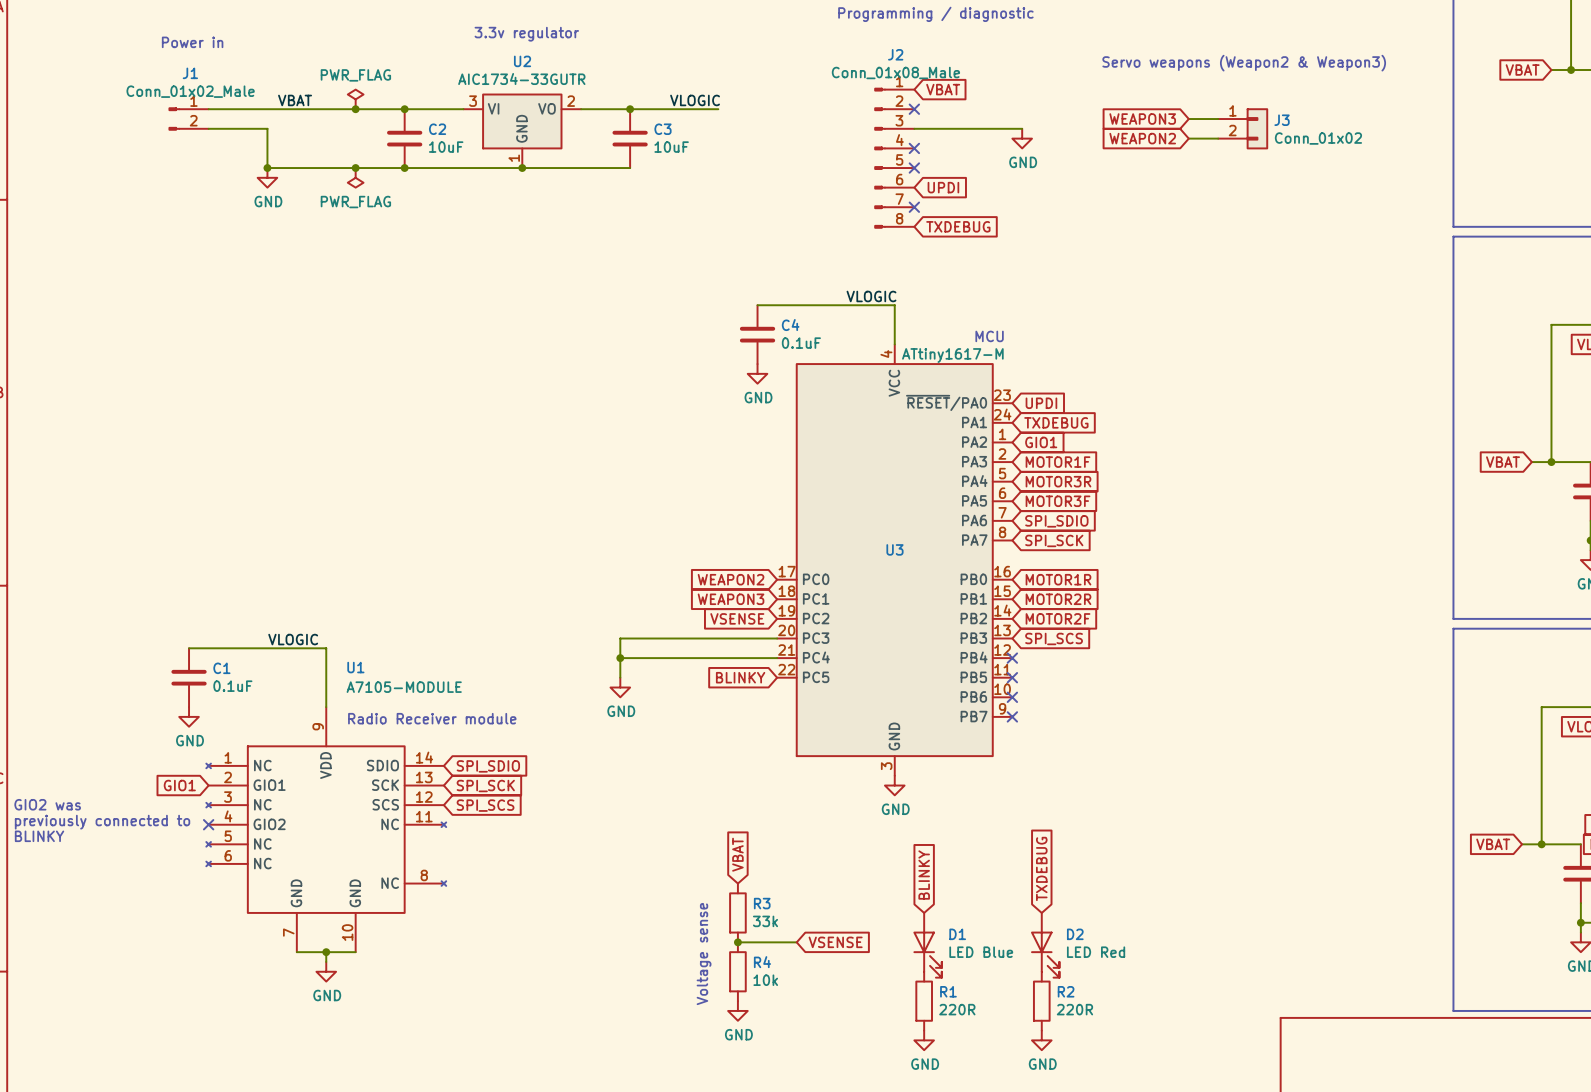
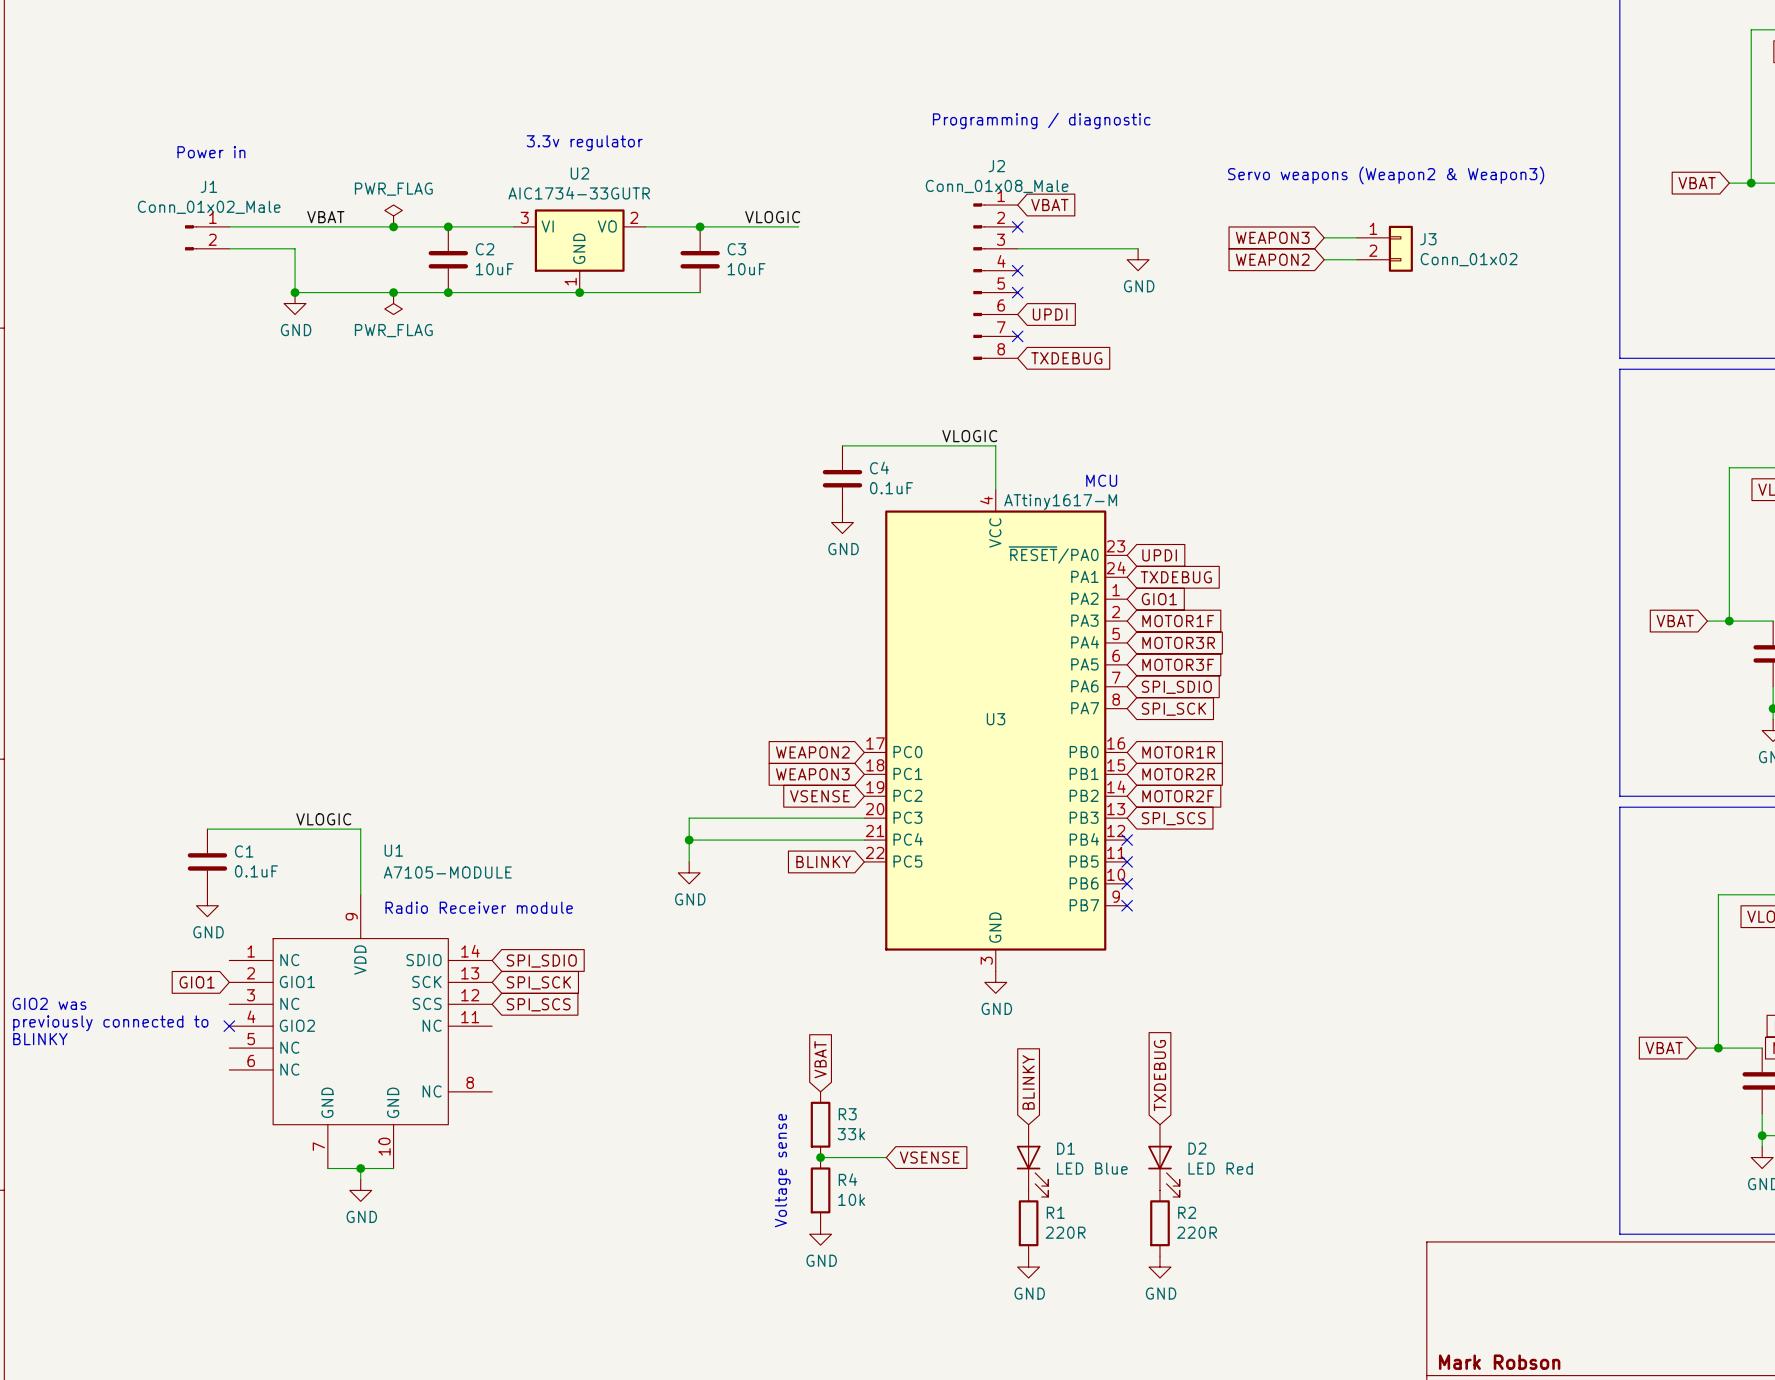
U1 symbol: [206, 707, 447, 953] -> [229, 894, 493, 1169]

